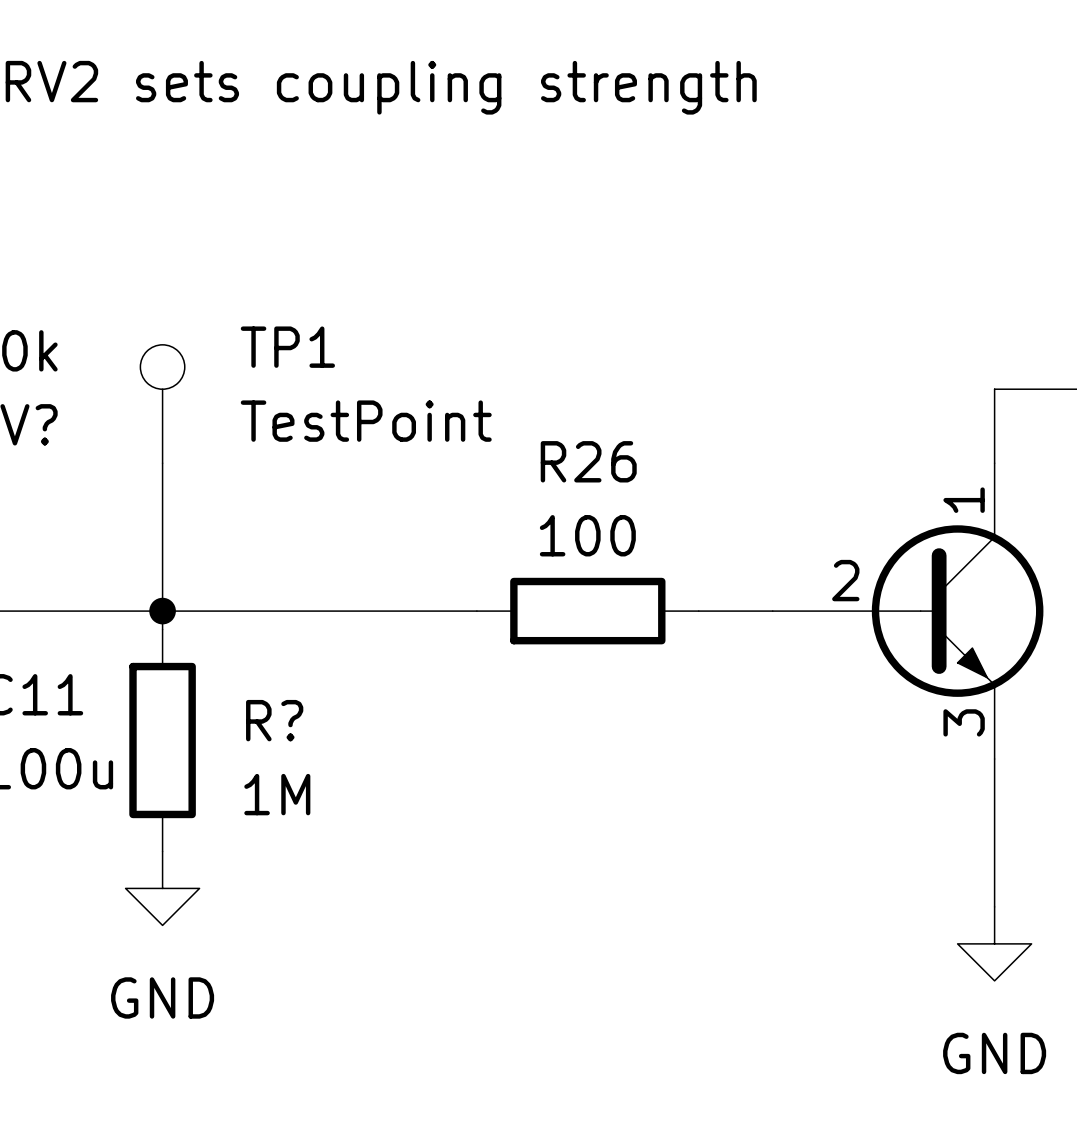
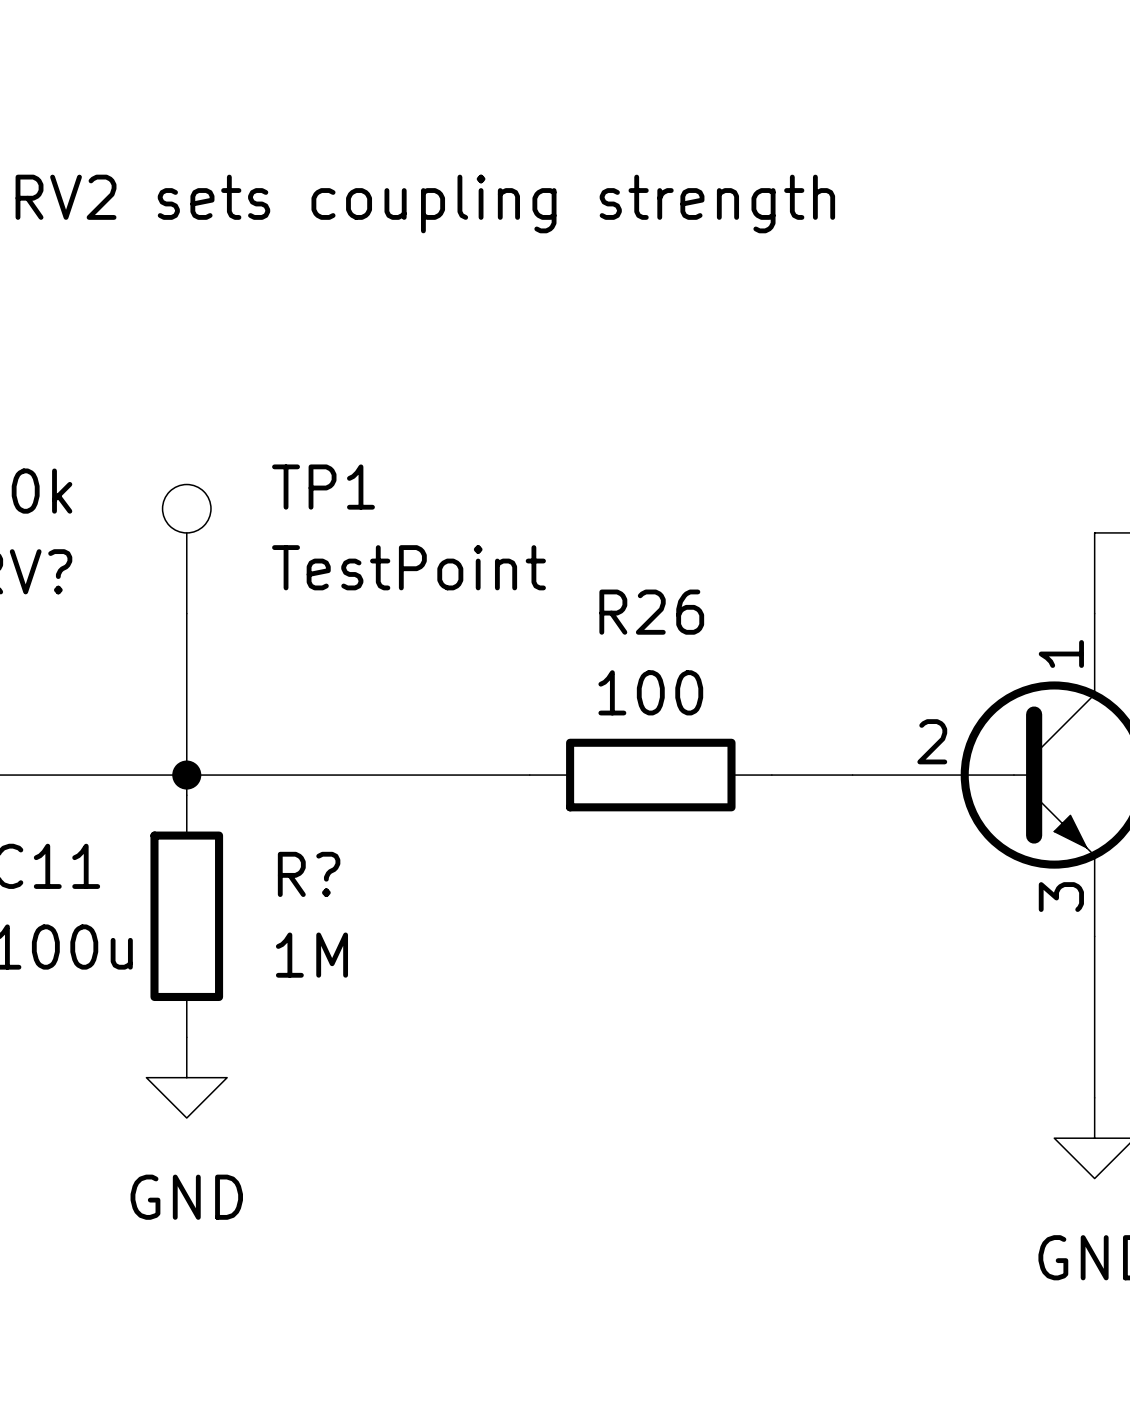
R? name position: R? (274, 720) -> R? (309, 874)
R? value position: 1M (277, 794) -> 1M (311, 955)

